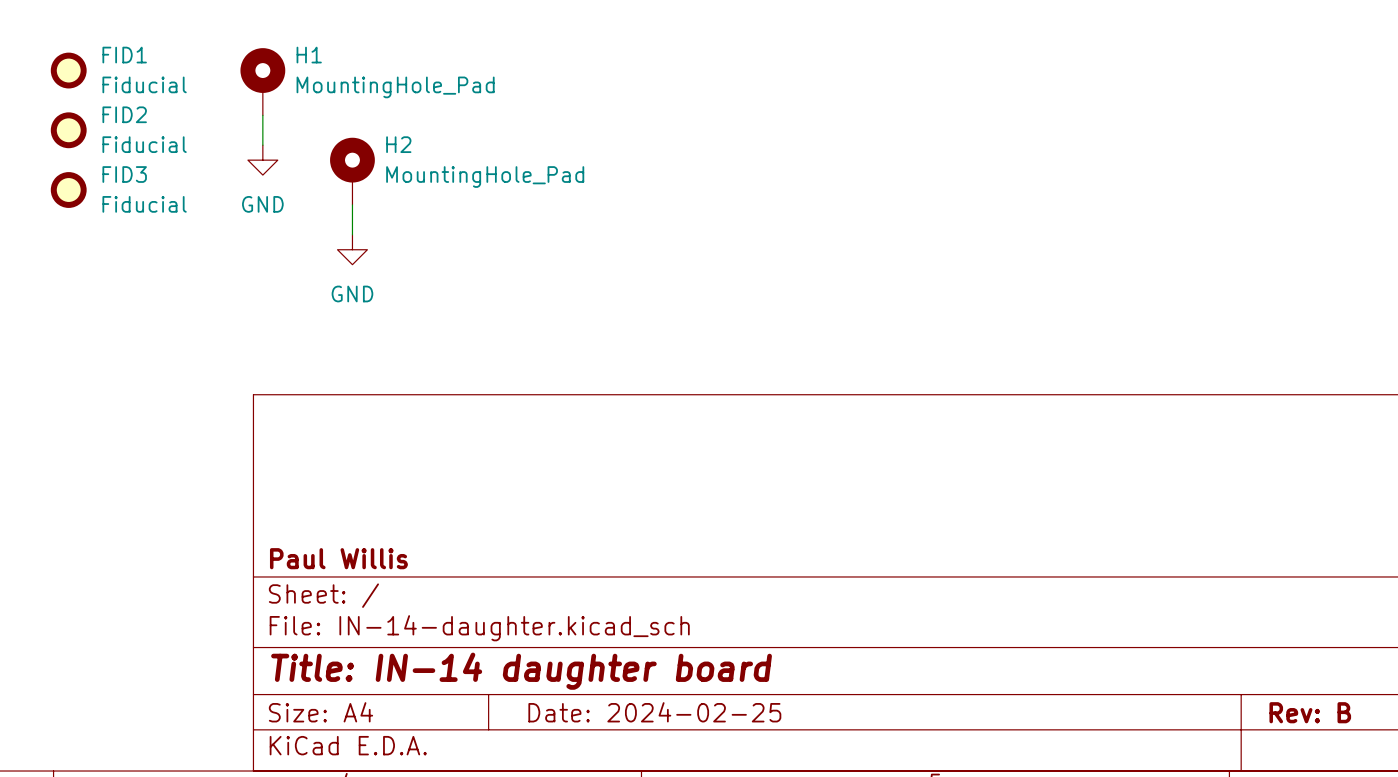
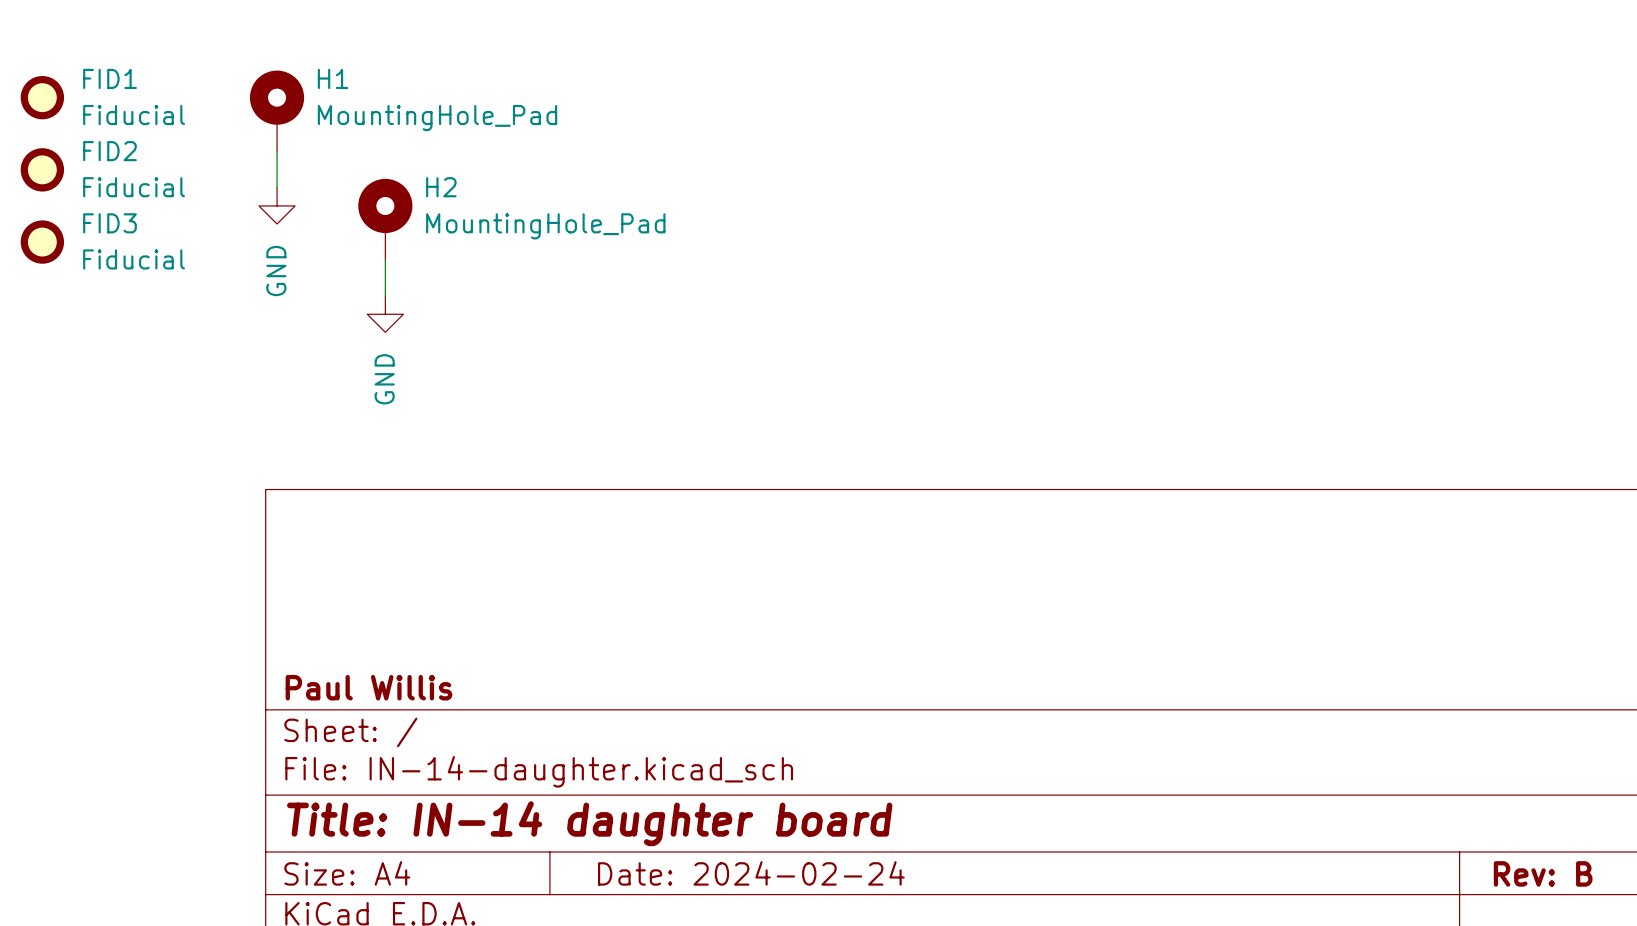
power symbol text rotation: 0° (262, 204) -> 90° counterclockwise (276, 271)
power symbol text rotation: 0° (352, 293) -> 90° counterclockwise (384, 379)
title block: Date: 2024-02-25 (654, 712) -> Date: 2024-02-24 (751, 873)

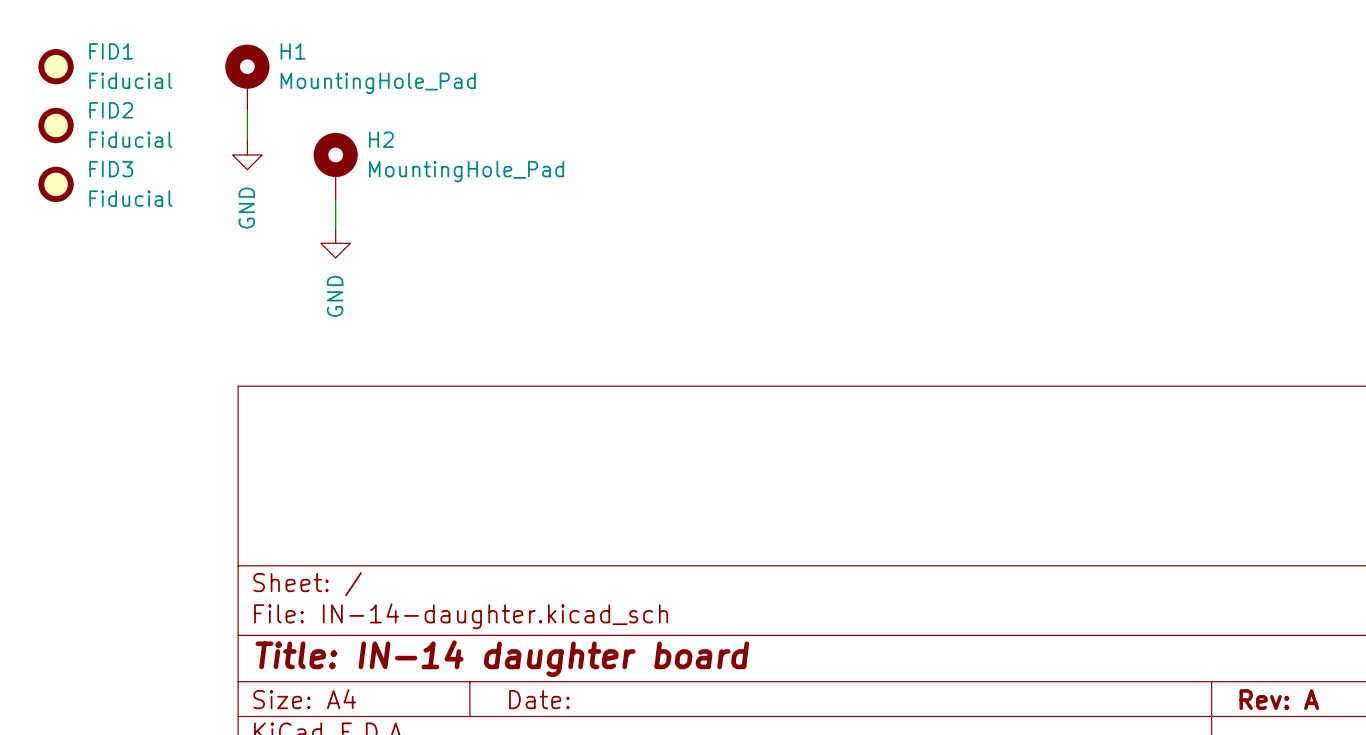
title block: Paul Willis (368, 687) -> none
title block: Date: 2024-02-24 (751, 873) -> Date: (539, 699)
title block: Rev: B (1543, 873) -> Rev: A (1279, 699)

